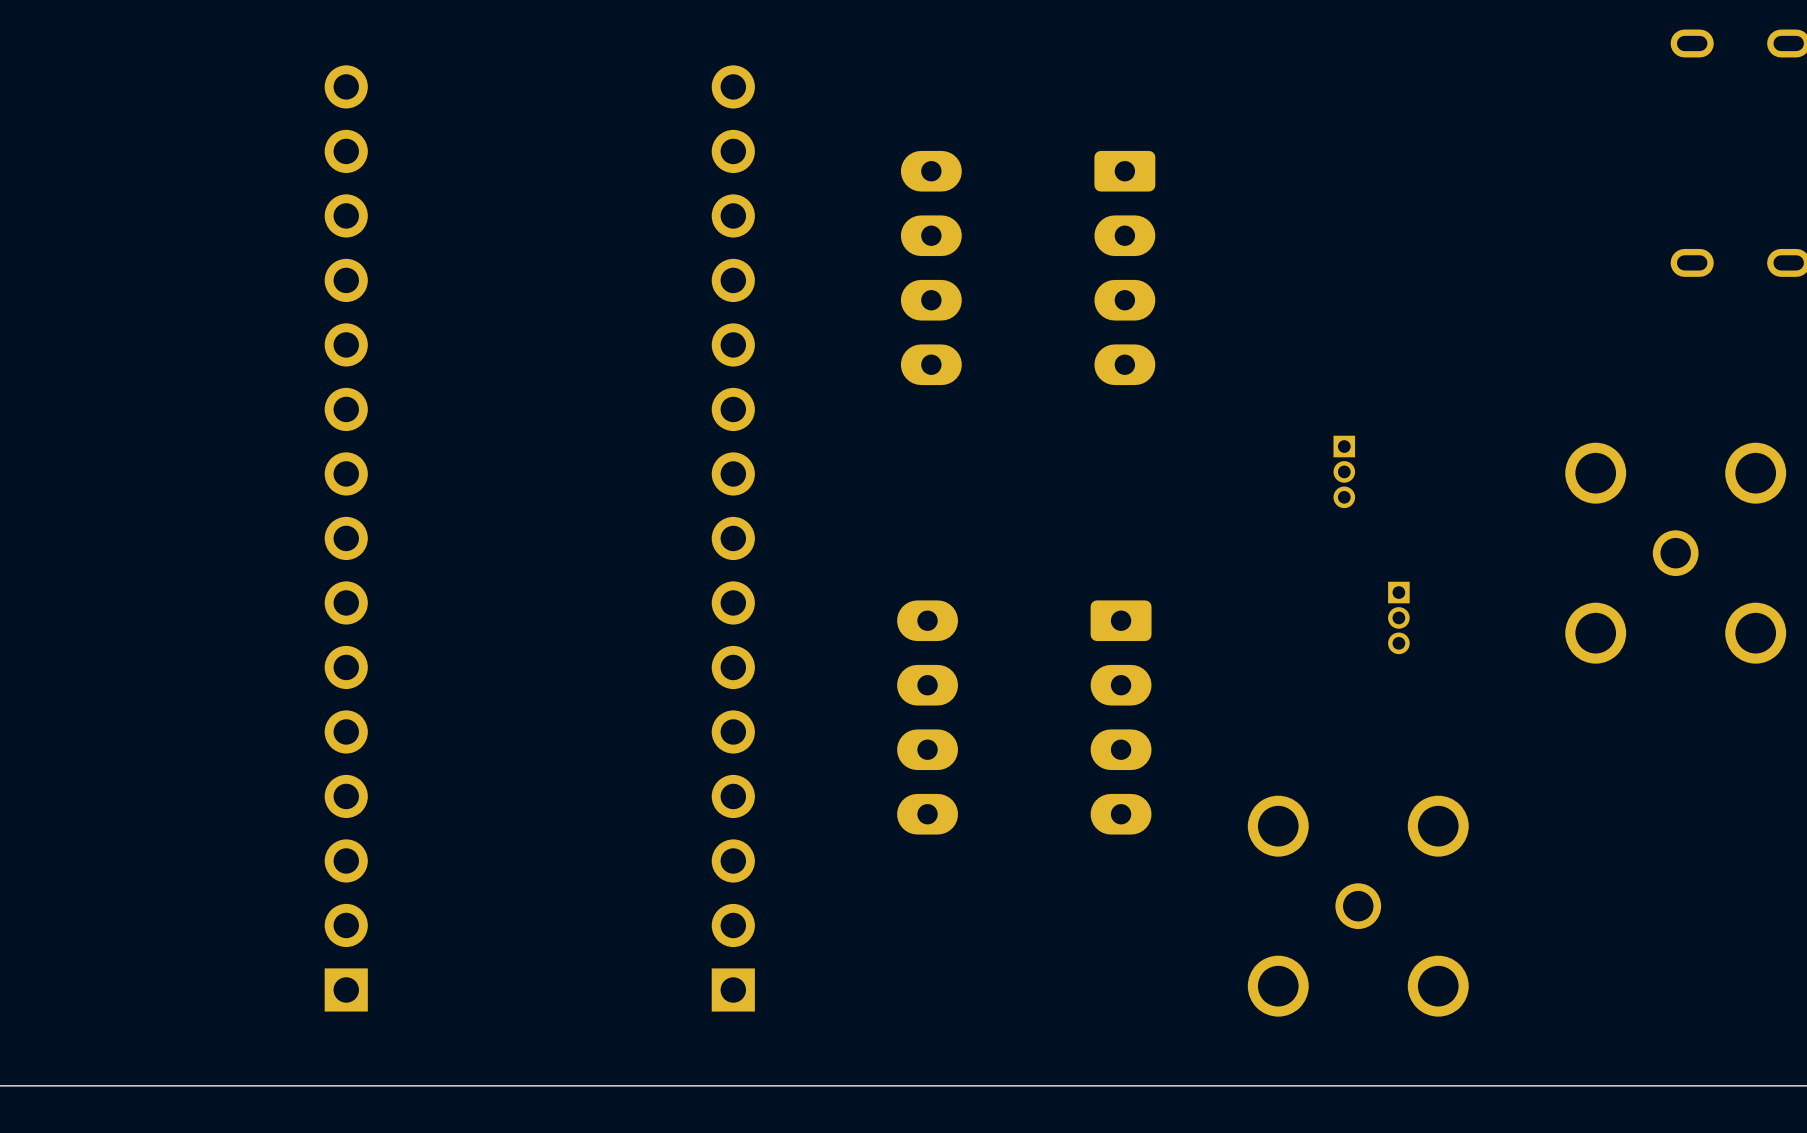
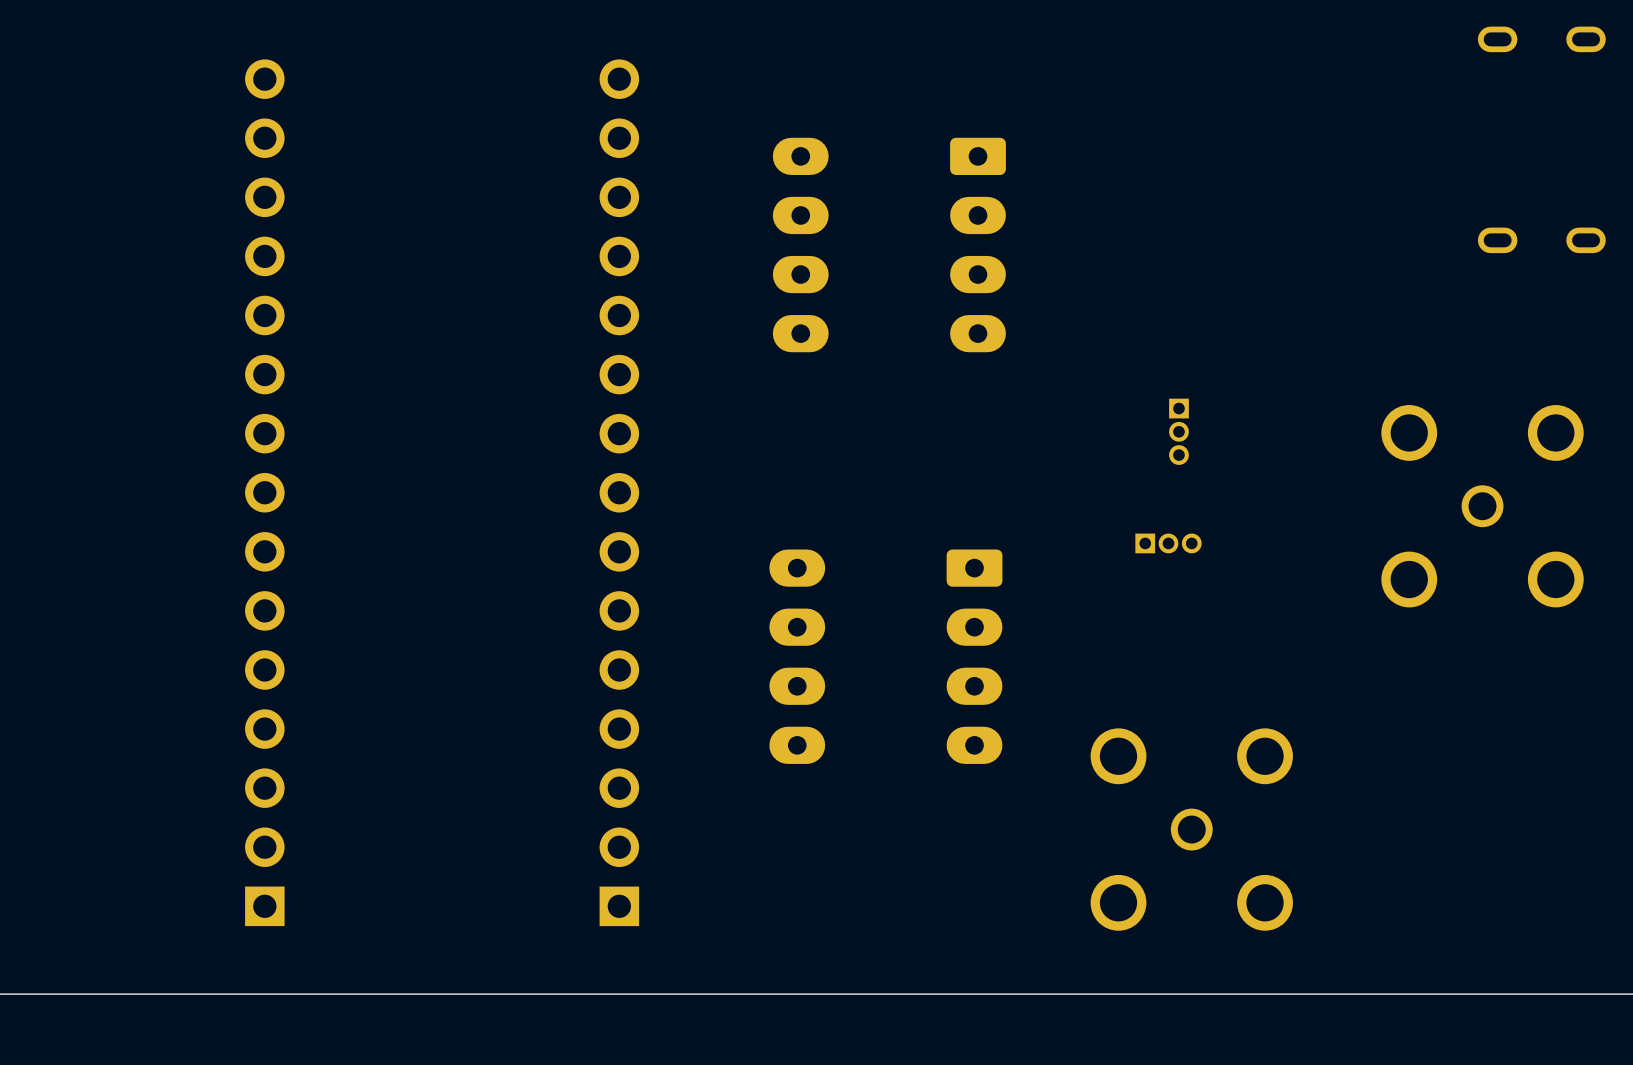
part rotation: 0° (1398, 617) -> 90° counterclockwise (1168, 543)
part position: (1398, 617) -> (1168, 543)

